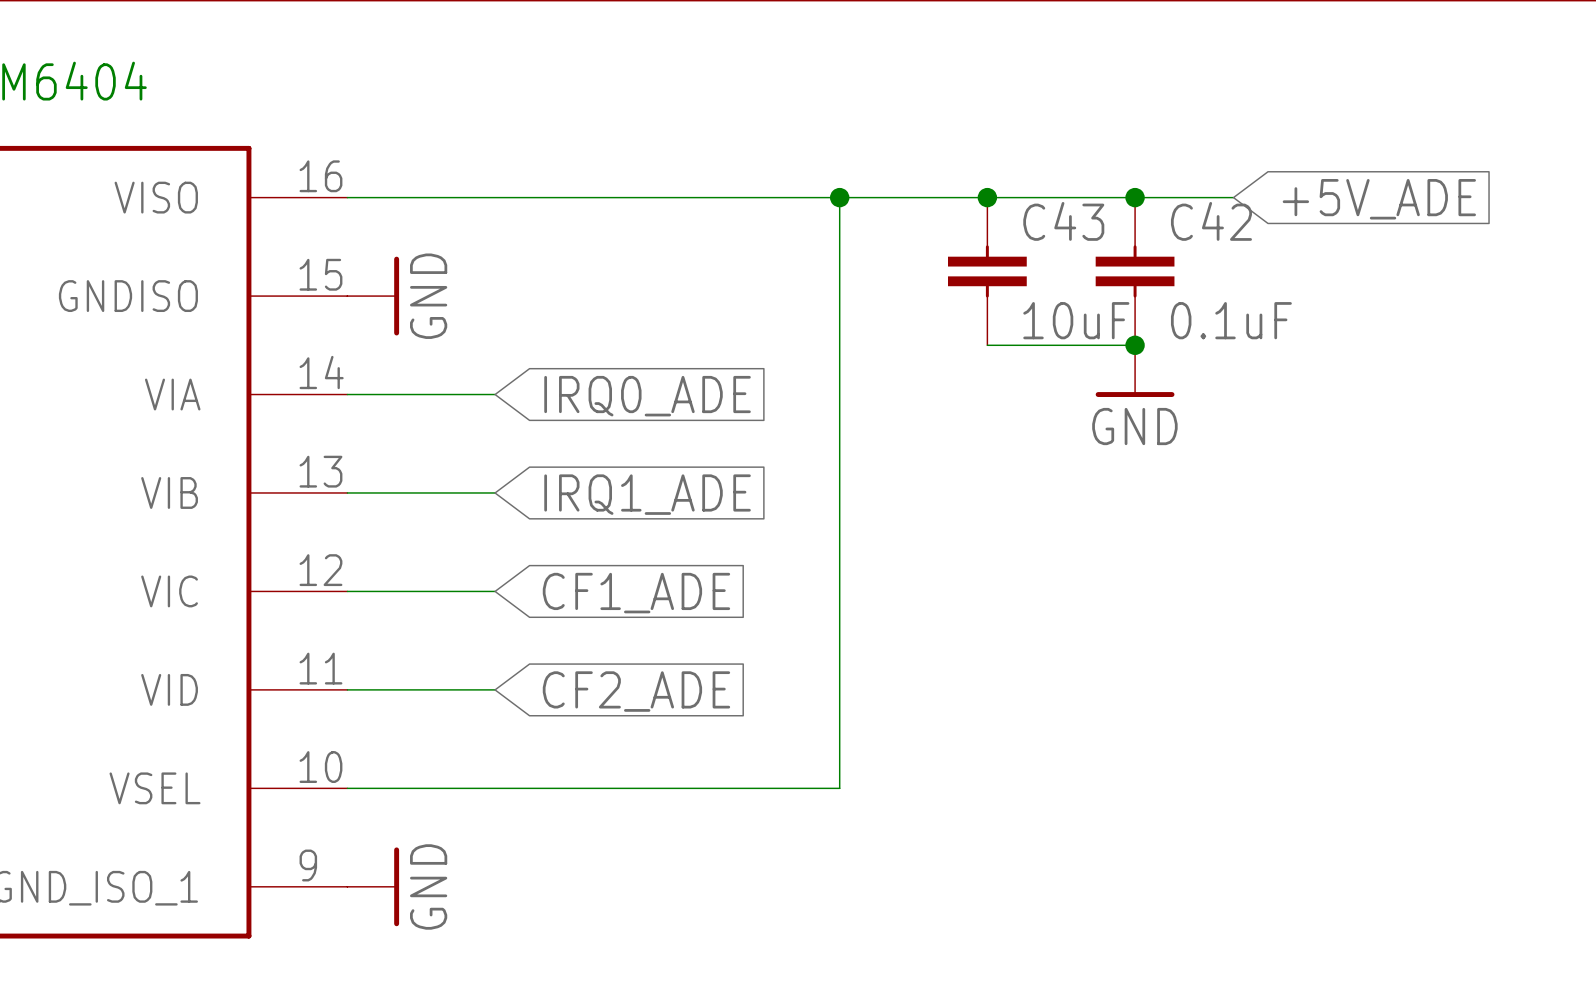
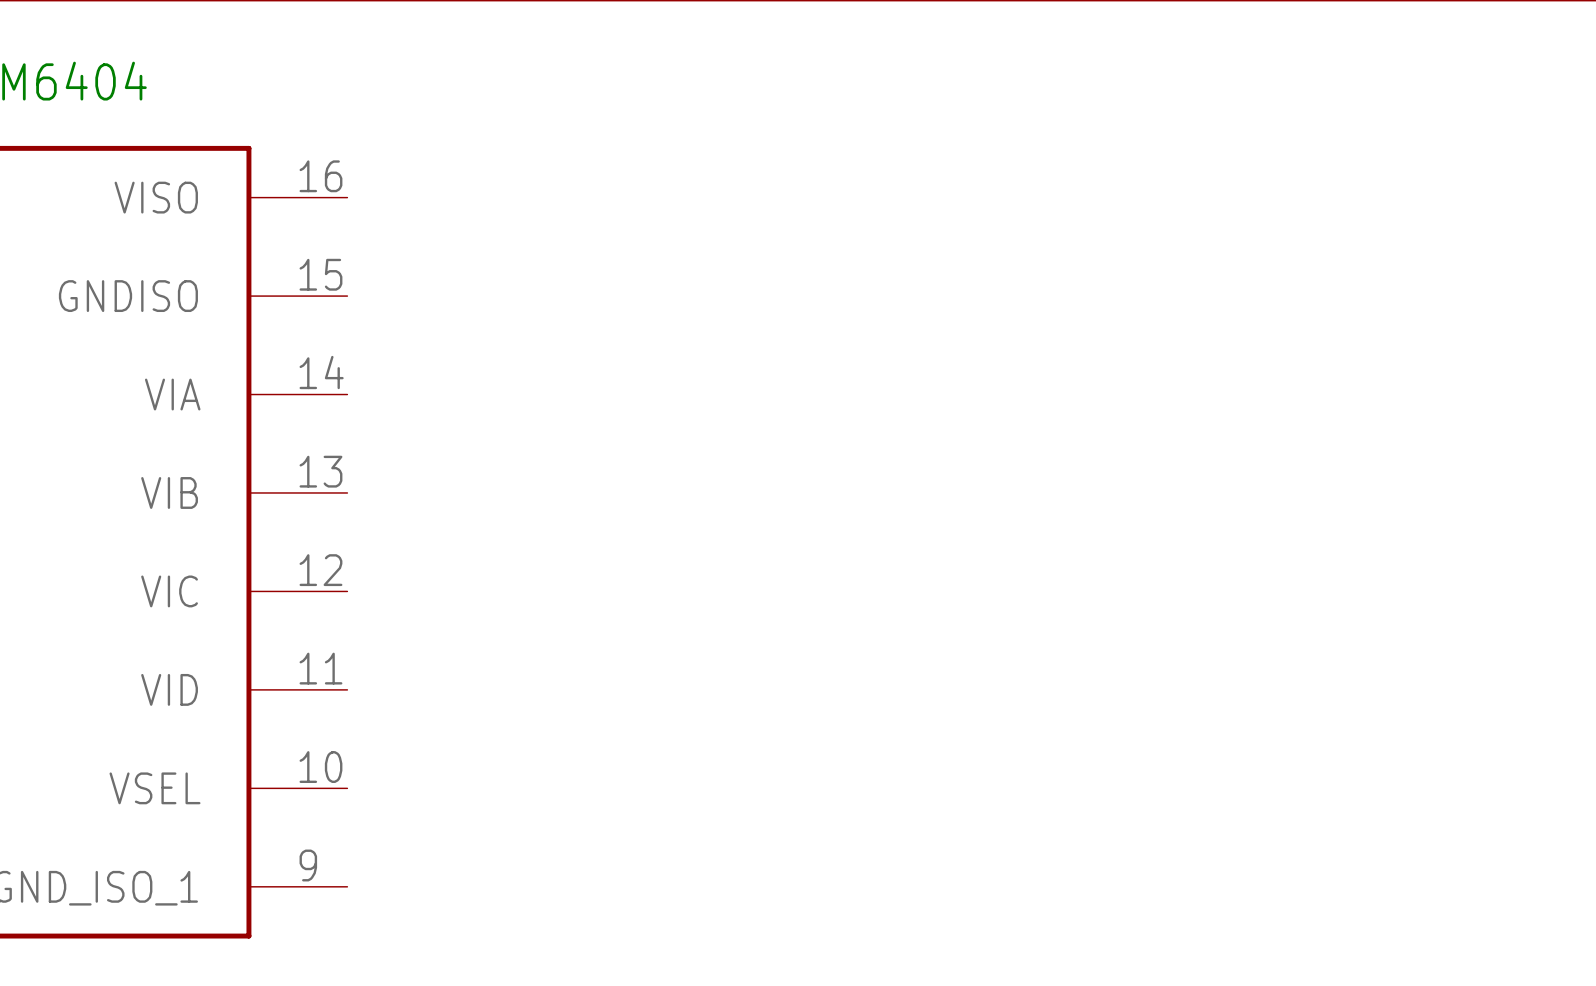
wire: (347, 197) (1233, 197) -> none
wire: (839, 197) (839, 788) (347, 788) -> none
junction: (839, 197) -> none
junction: (987, 197) -> none
junction: (1135, 197) -> none
global label: +5V_ADE (1379, 199) -> none
C43: 10uF (987, 271) -> none
C42: 0.1uF (1135, 271) -> none
power symbol: GND (373, 296) -> none
wire: (987, 345) (1135, 345) -> none
junction: (1135, 345) -> none
power symbol: GND (1135, 371) -> none
wire: (347, 394) (495, 394) -> none
global label: IRQ0_ADE (647, 396) -> none
wire: (347, 492) (495, 492) -> none
global label: IRQ1_ADE (647, 494) -> none
wire: (347, 591) (495, 591) -> none
global label: CF1_ADE (636, 593) -> none
wire: (347, 689) (495, 689) -> none
global label: CF2_ADE (636, 691) -> none
power symbol: GND (373, 886) -> none

